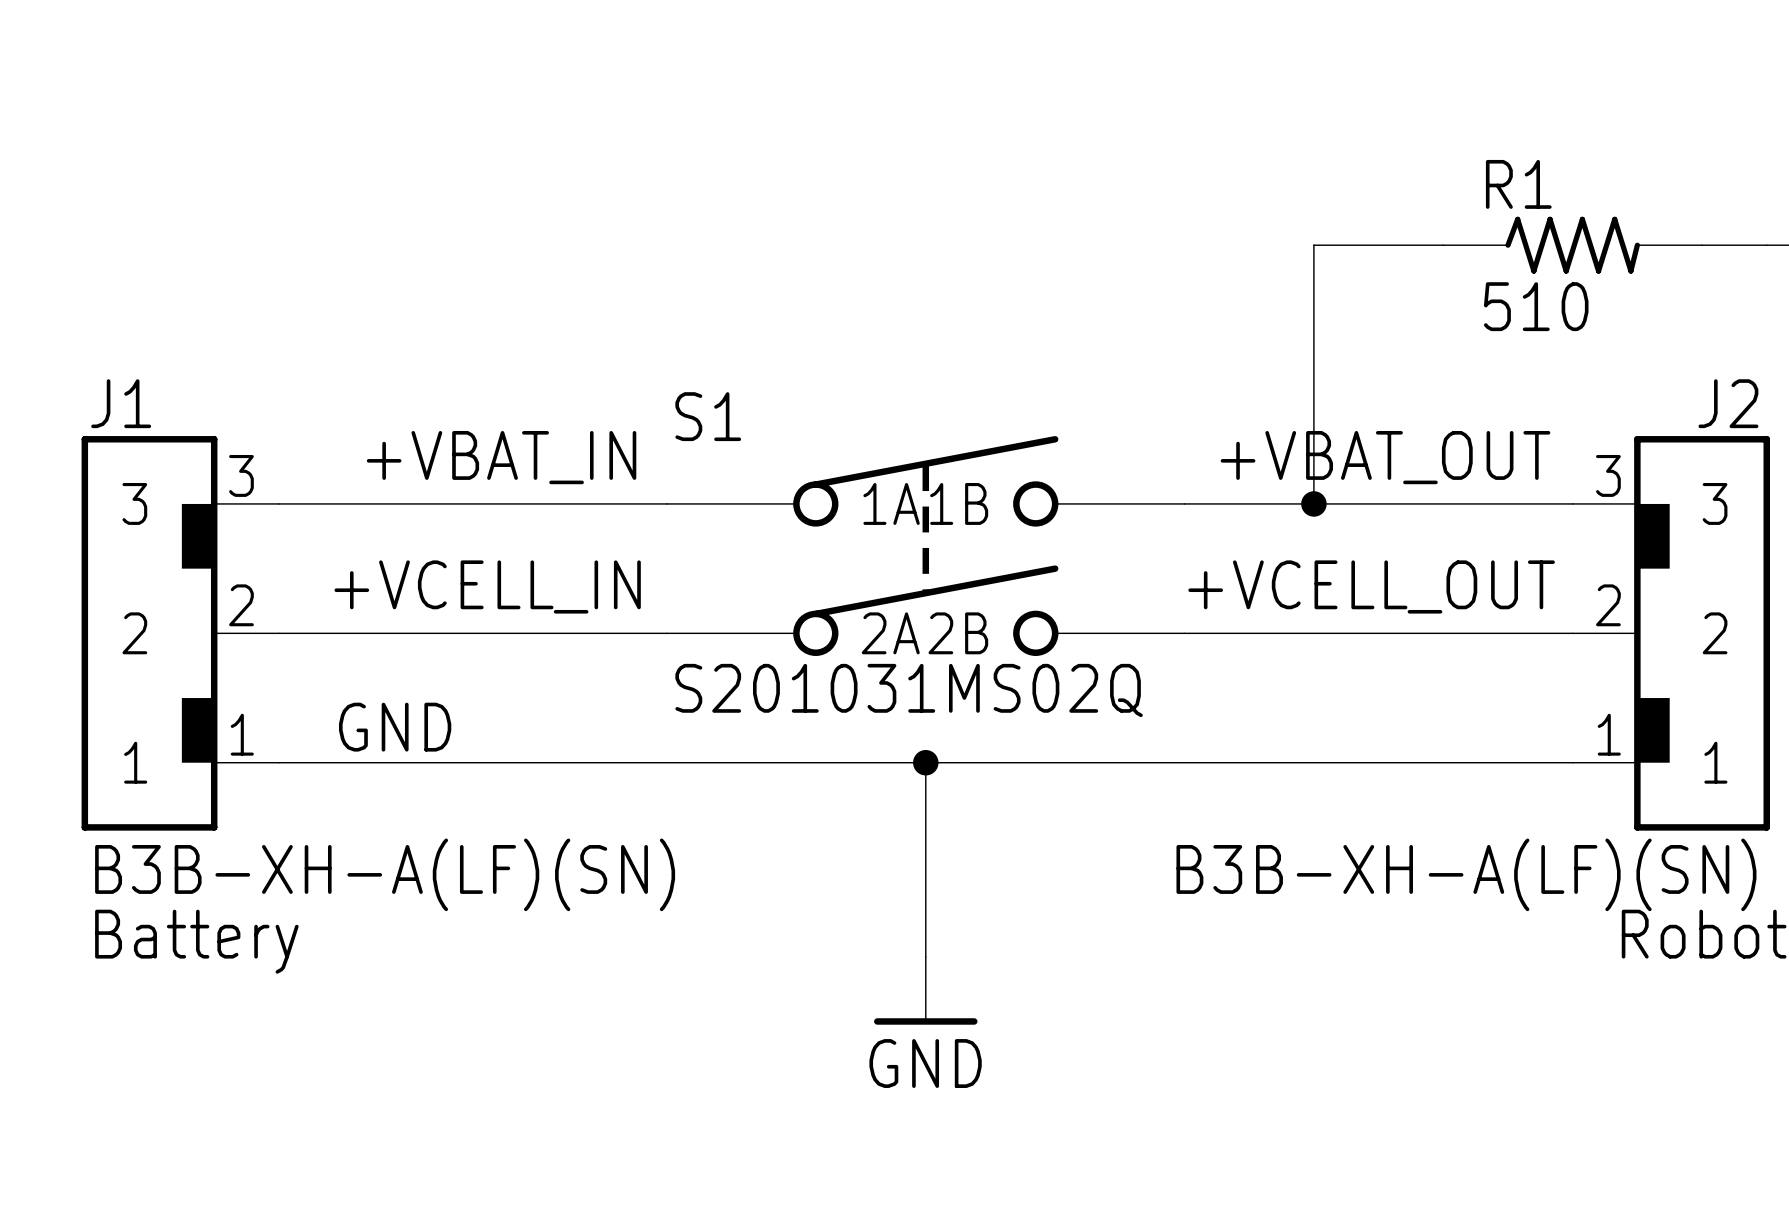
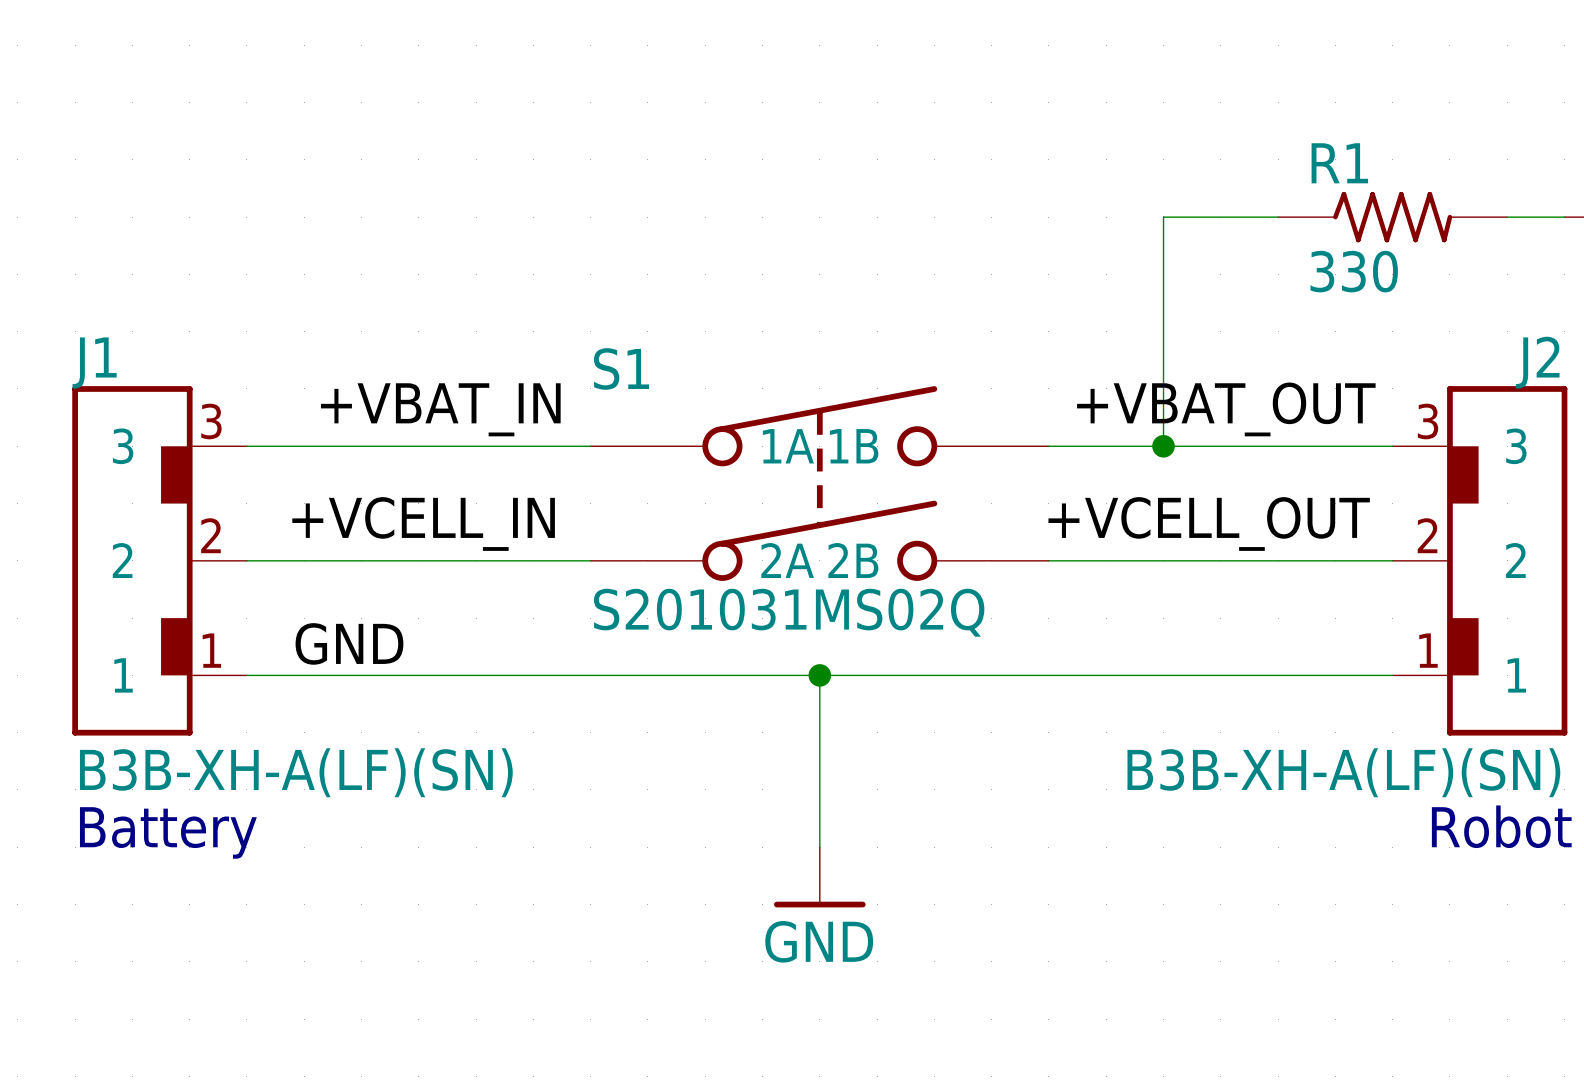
R1 value: 510 (1536, 306) -> 330 (1354, 271)

